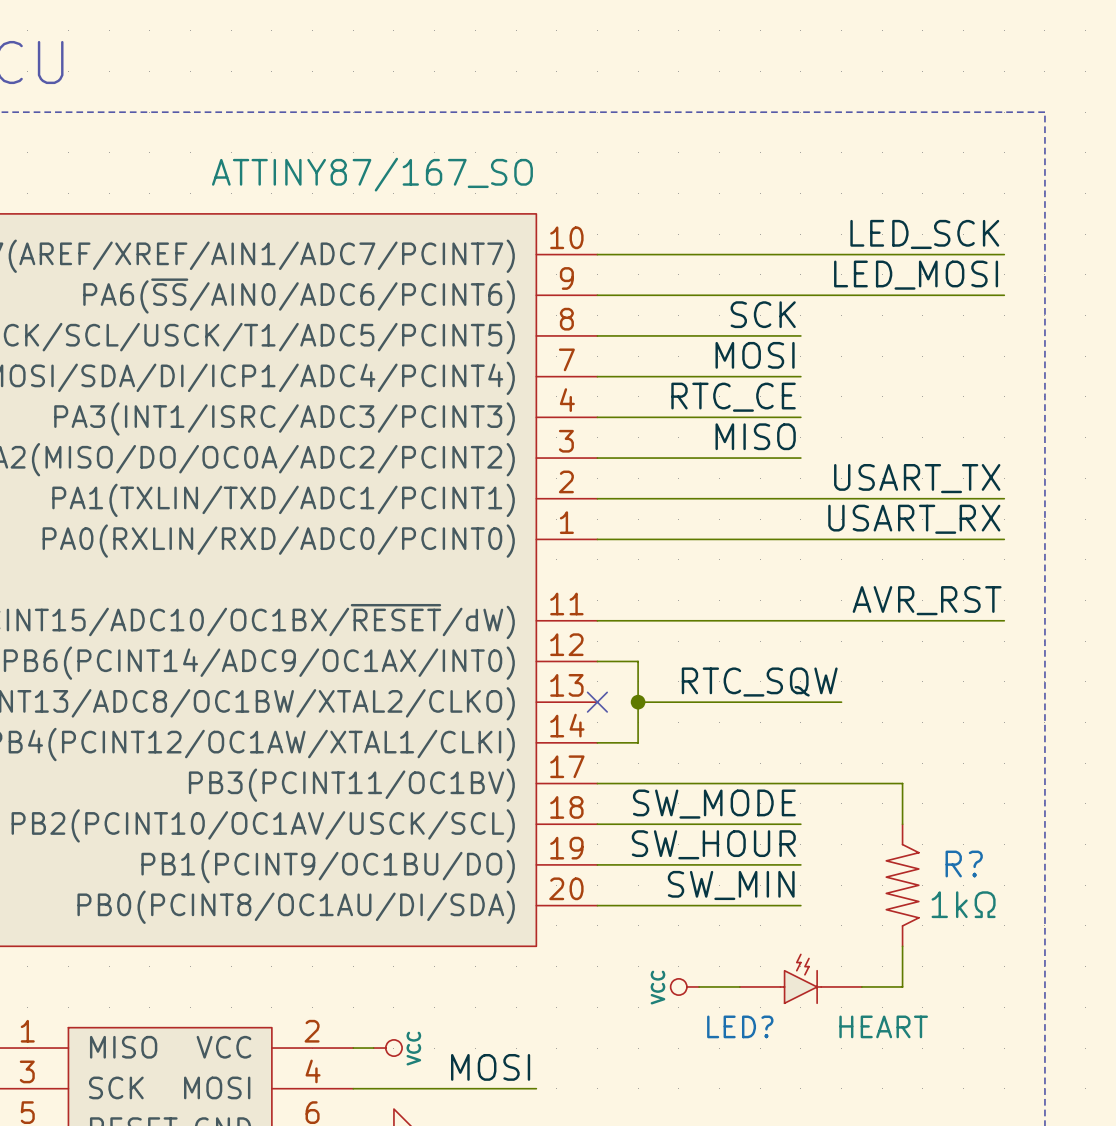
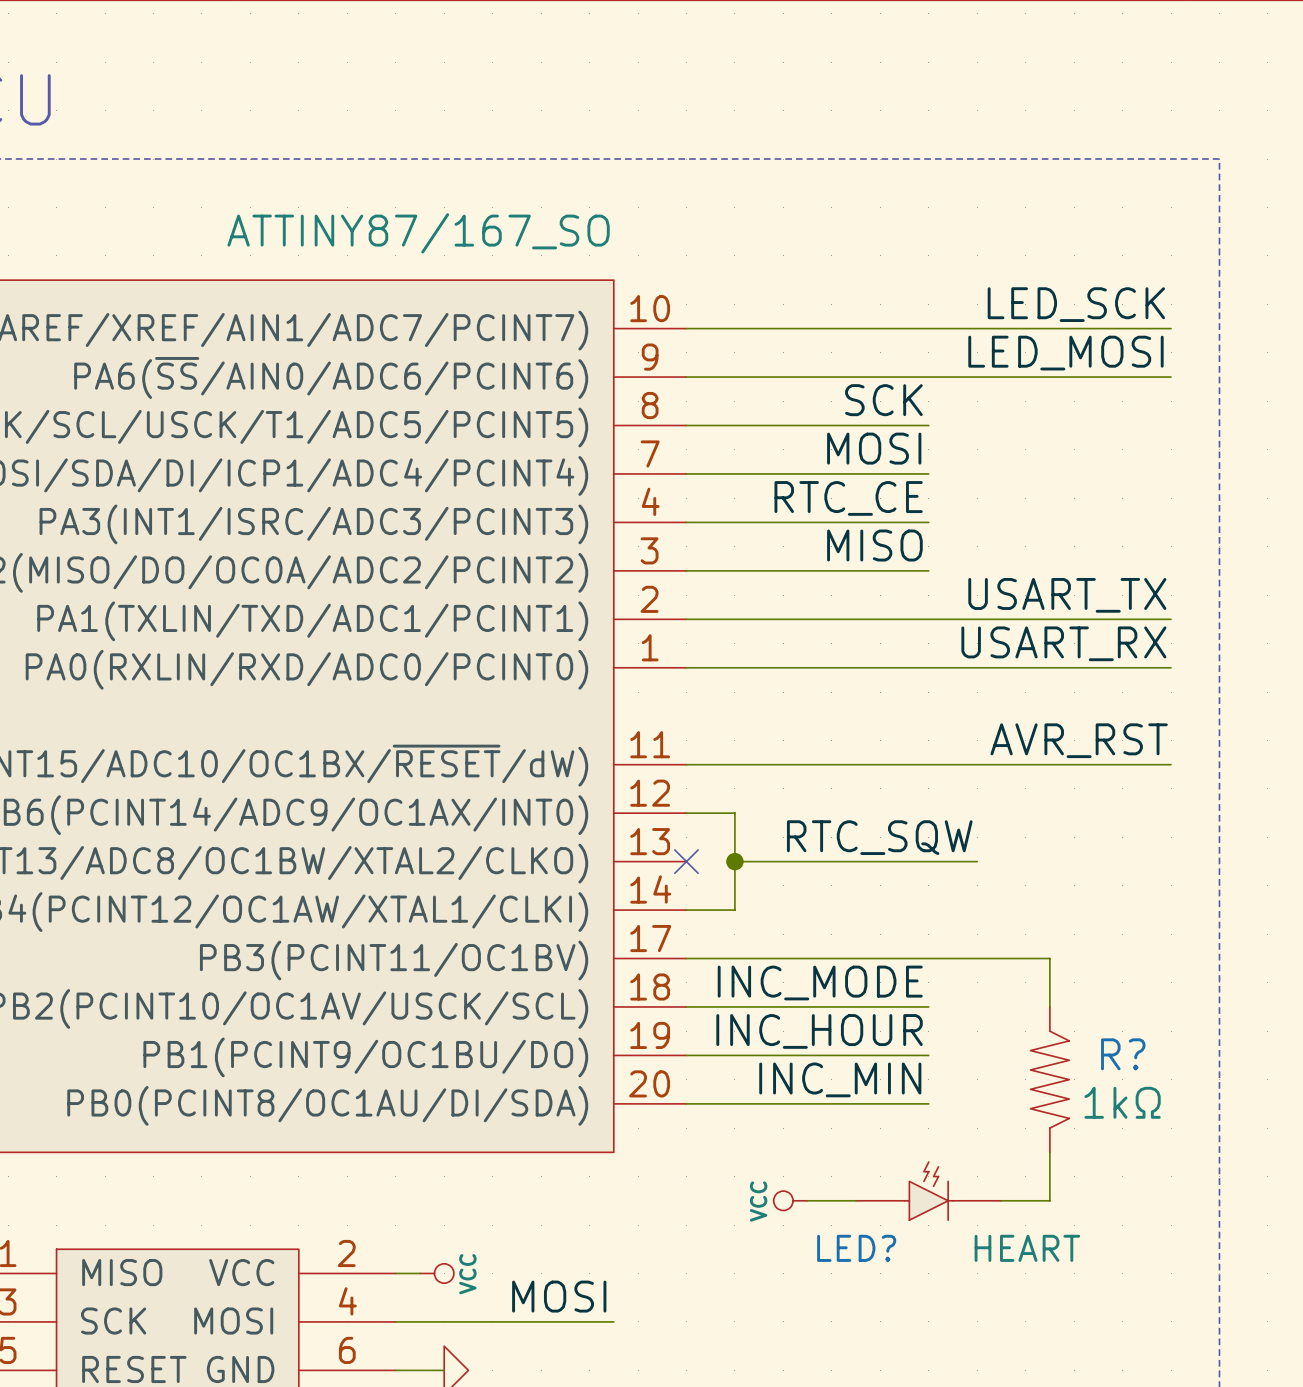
label: SW_MODE (714, 804) -> INC_MODE (820, 983)
label: SW_HOUR (713, 844) -> INC_HOUR (819, 1031)
label: SW_MIN (731, 885) -> INC_MIN (840, 1079)

